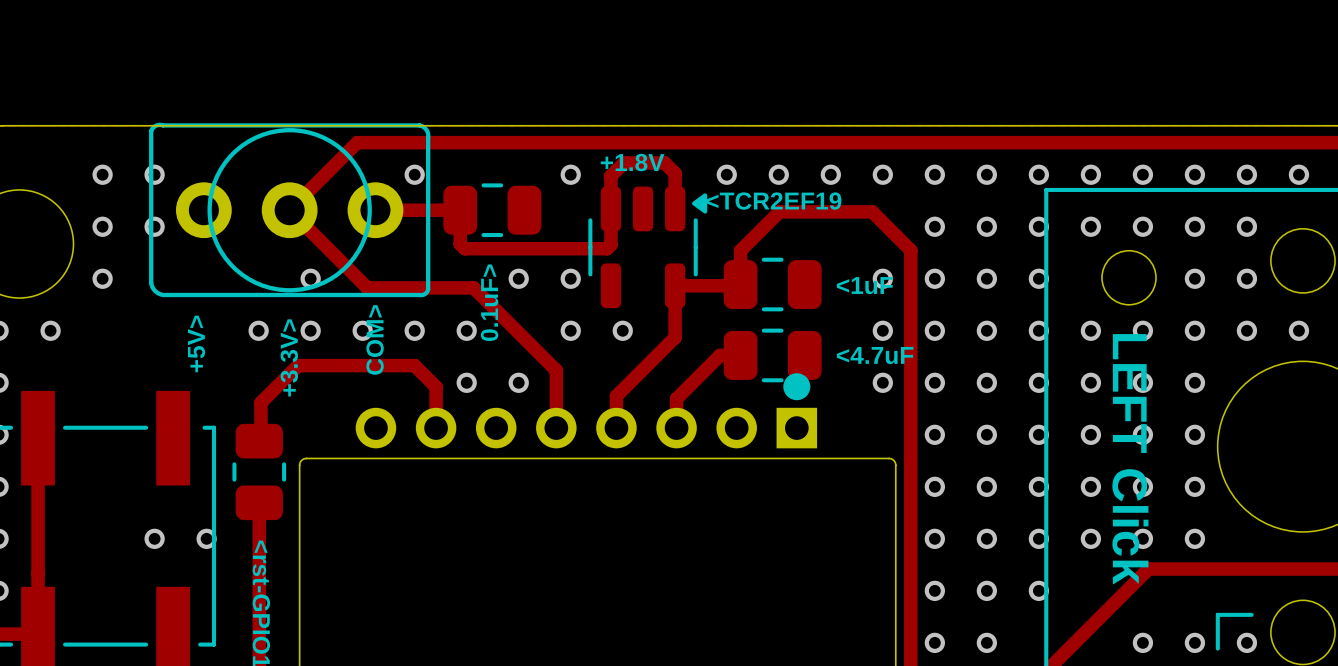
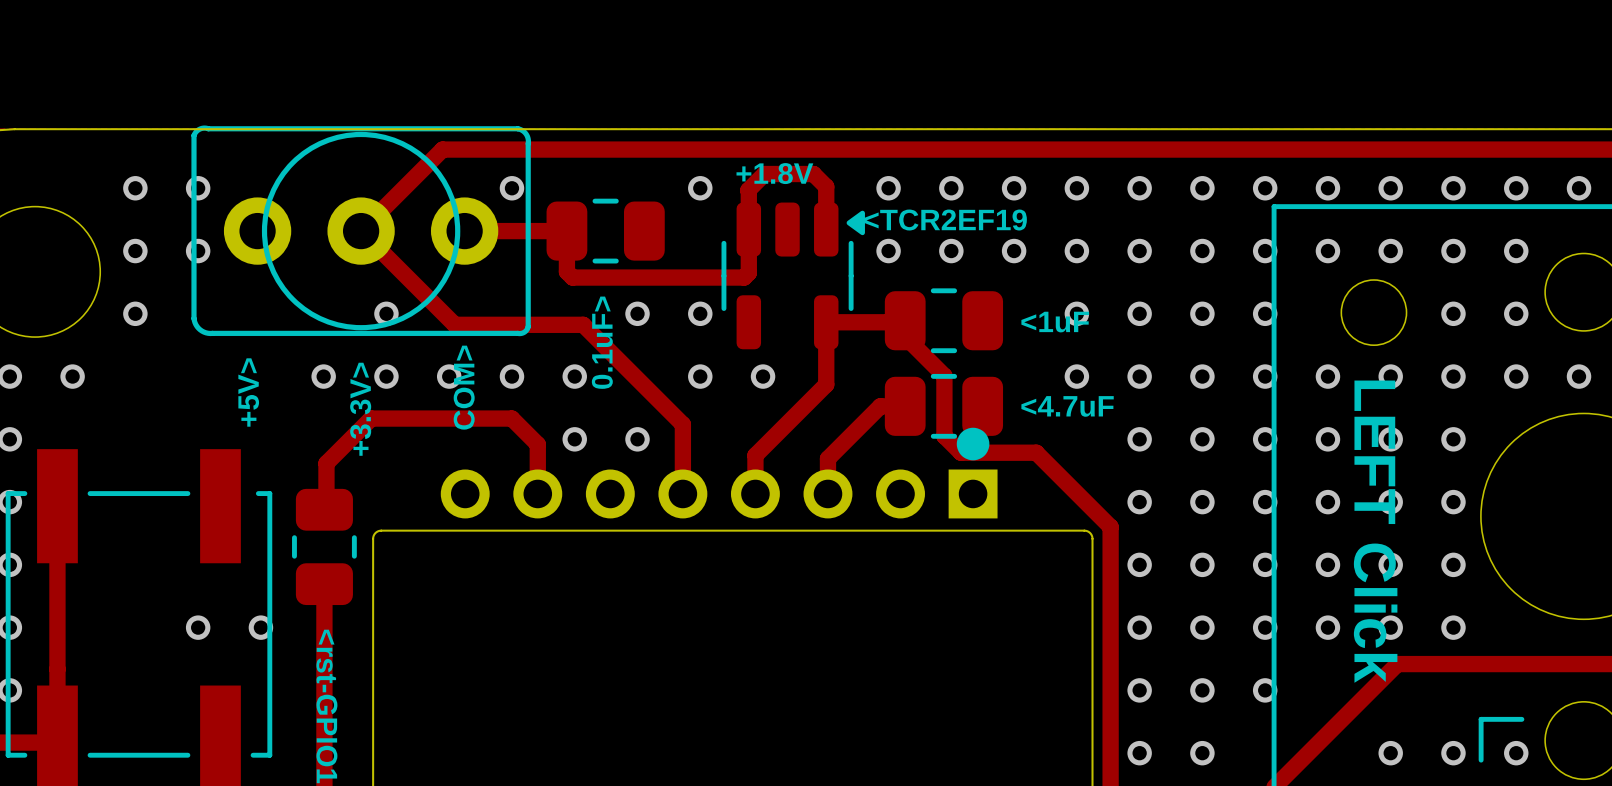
via: none -> (888, 251)
via: none -> (951, 251)
via: none -> (1014, 251)
via: none -> (1076, 251)
track: (740, 284) (740, 250) (779, 211) (872, 211) (910, 250) (910, 455) -> (890, 322) (944, 375) (944, 436) (960, 452) (1036, 452) (1110, 527)
via: (882, 382) -> none

